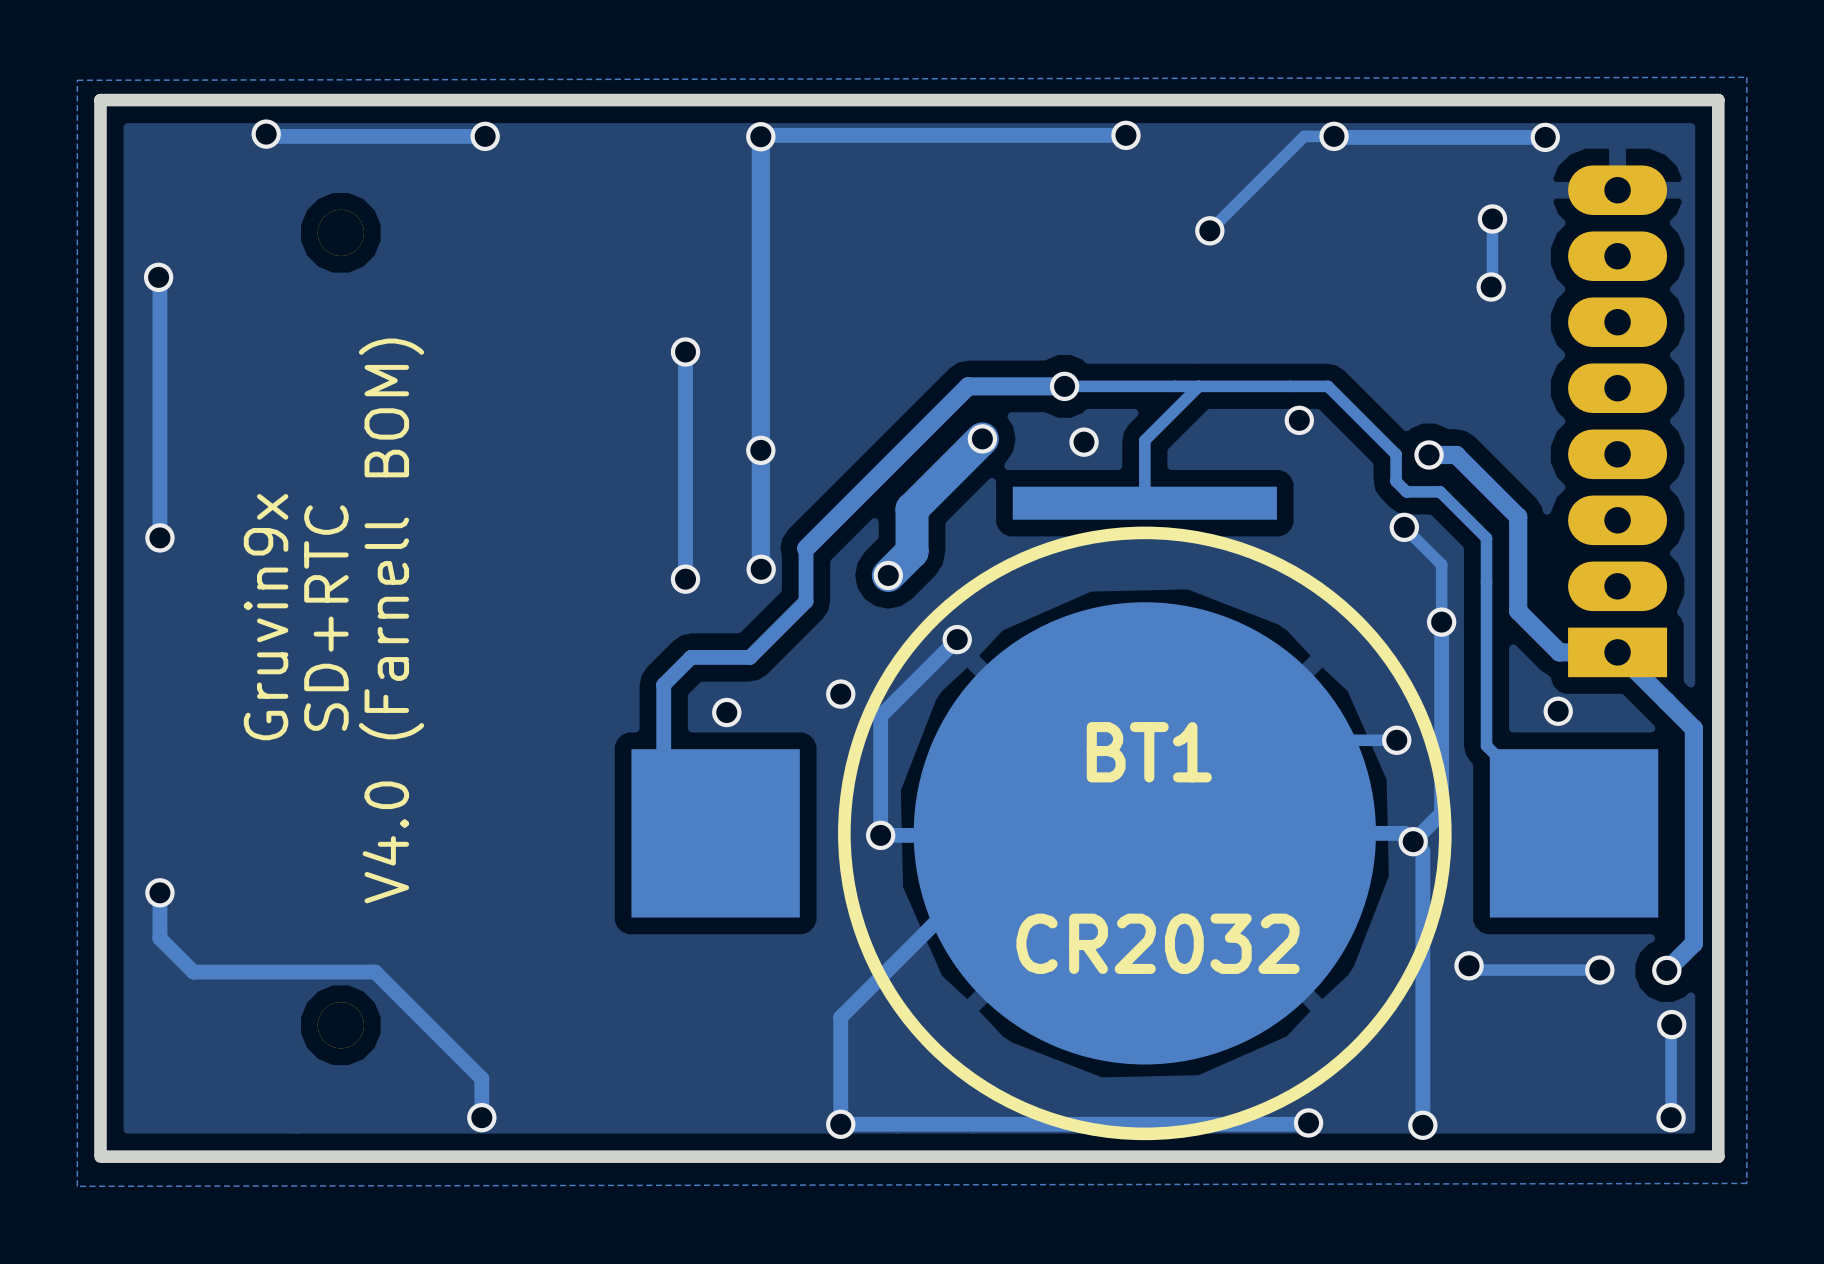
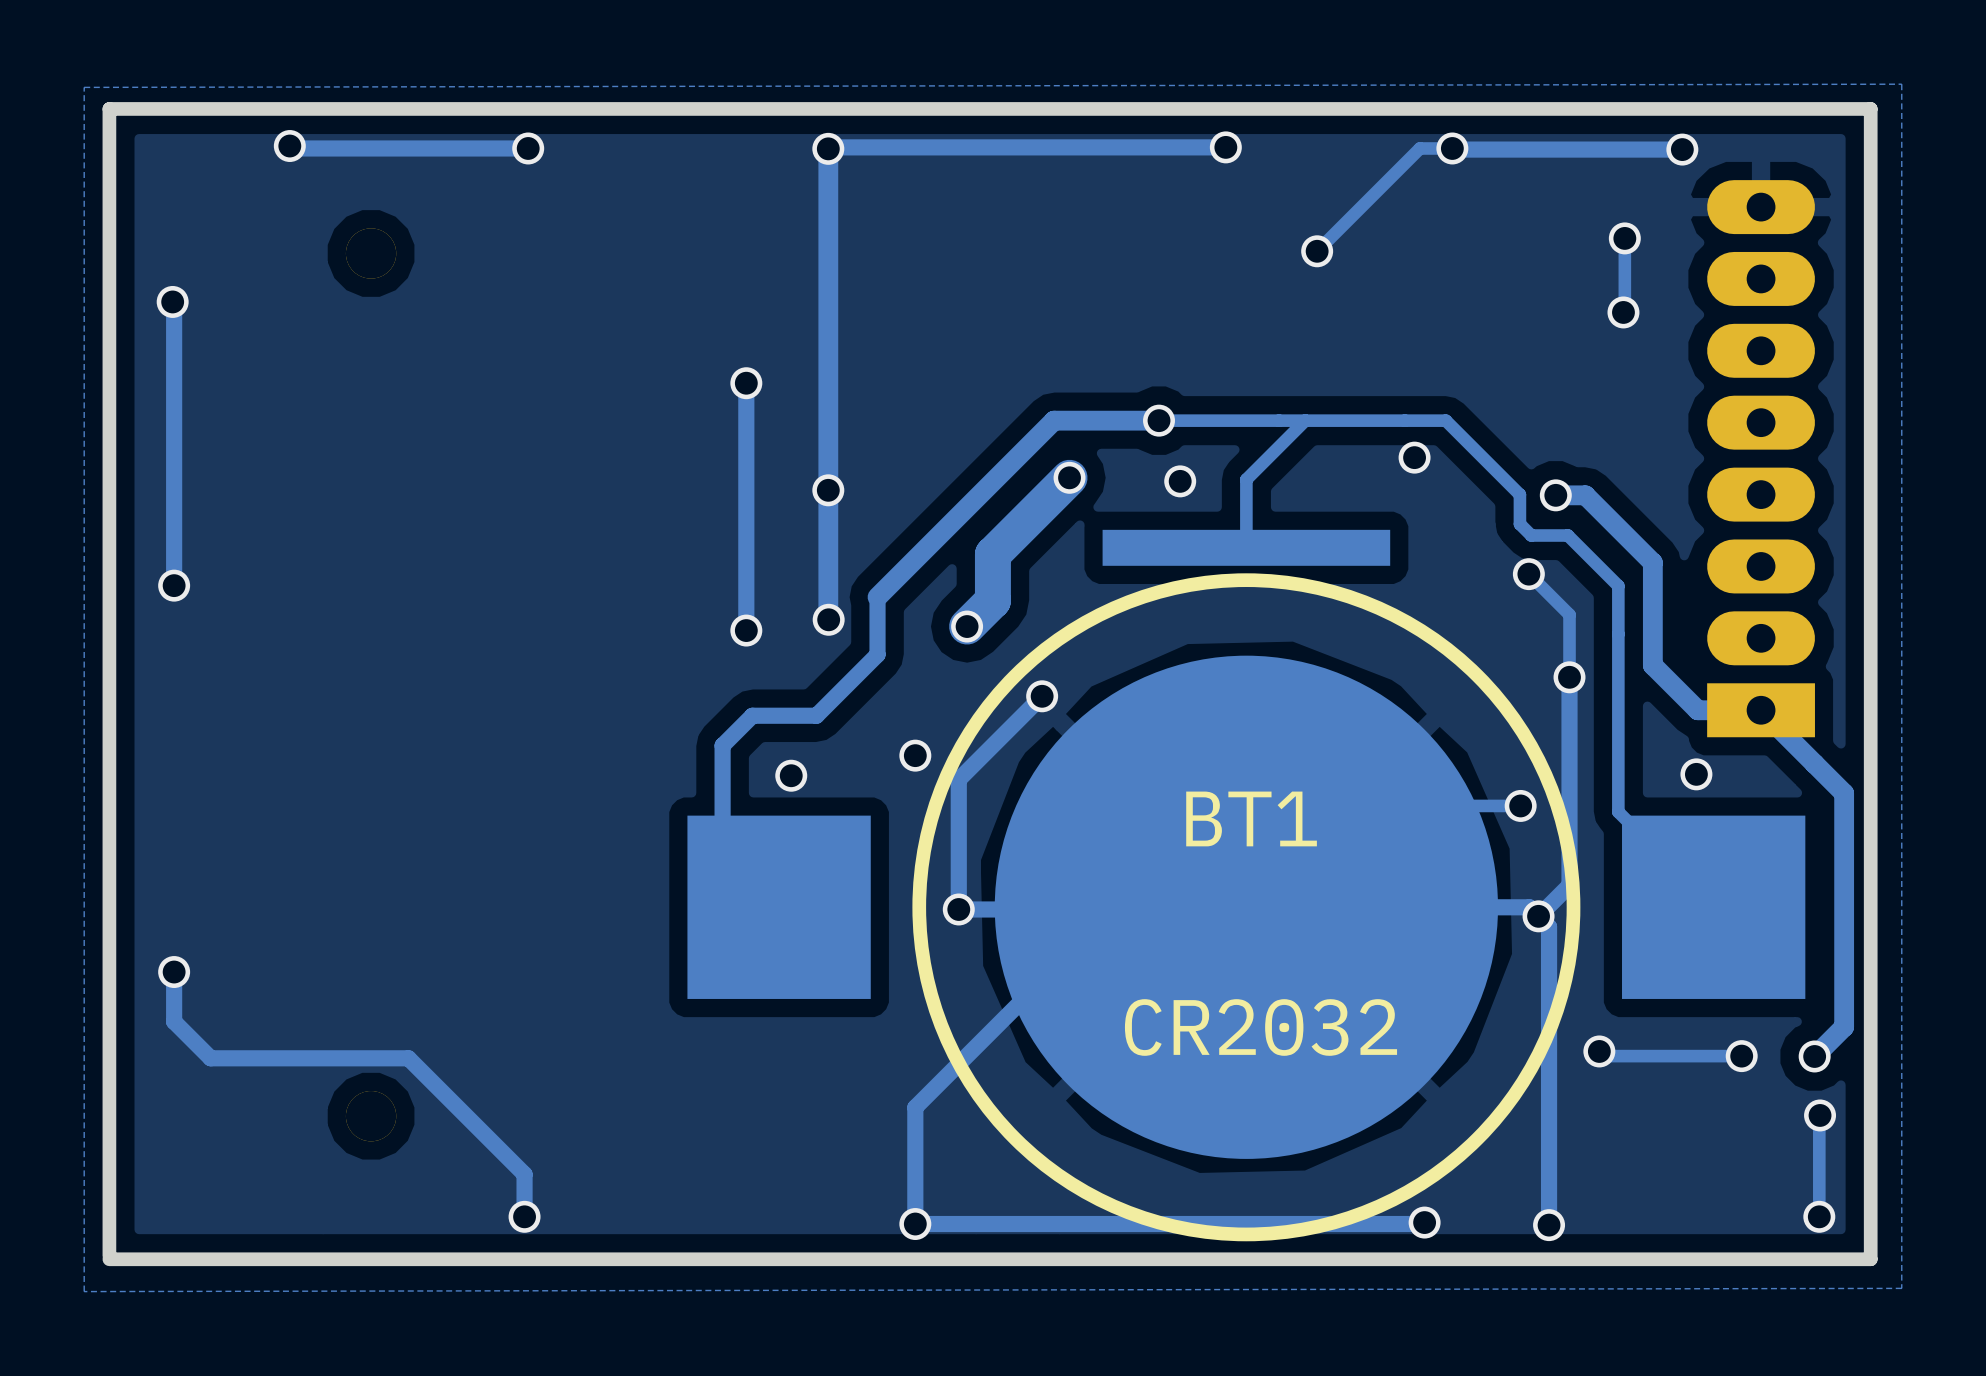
text: Gruvin9x (266, 617) -> none
text: SD+RTC (326, 618) -> none
text: V4.0 (Farnell BOM) (391, 620) -> none

